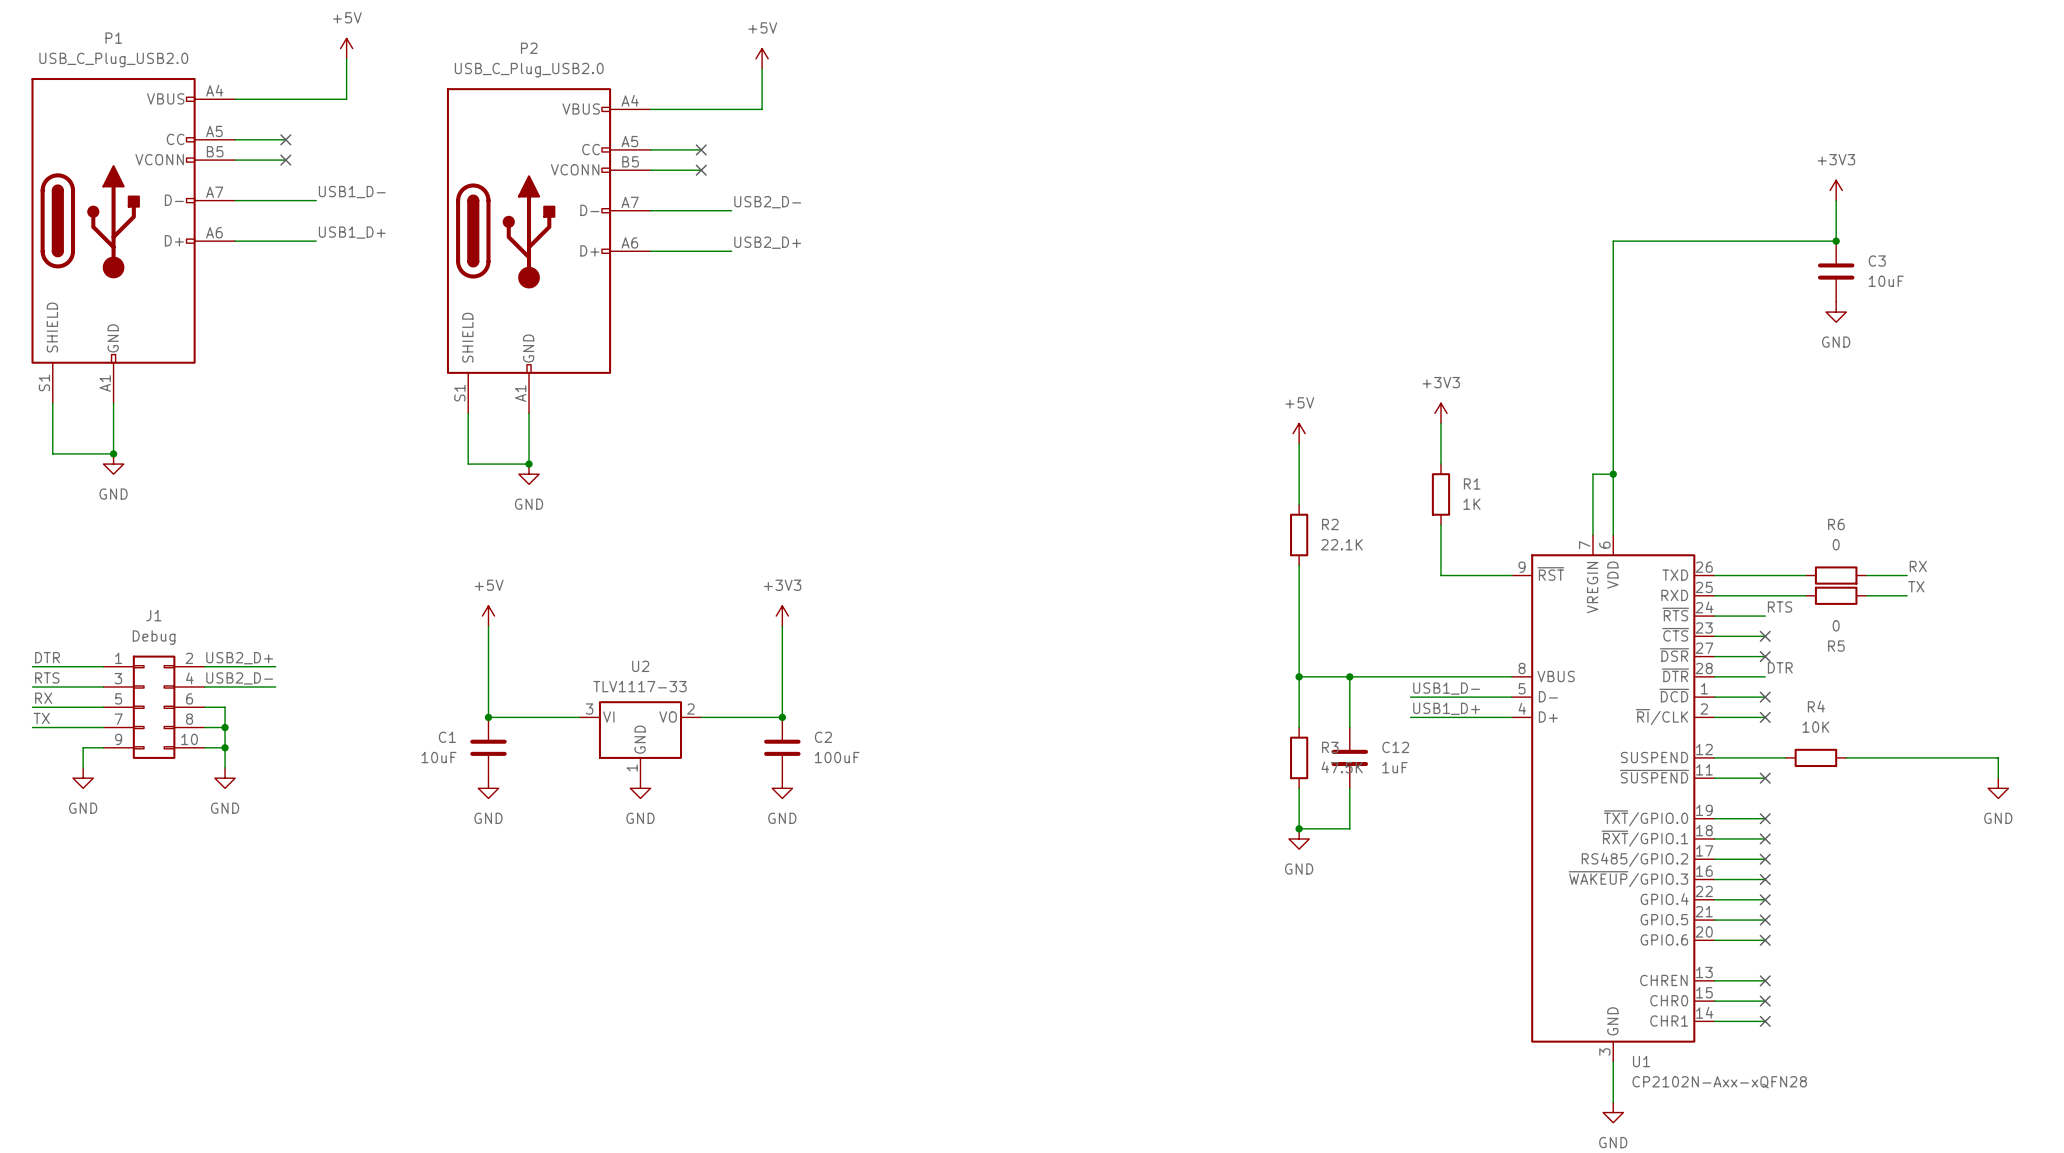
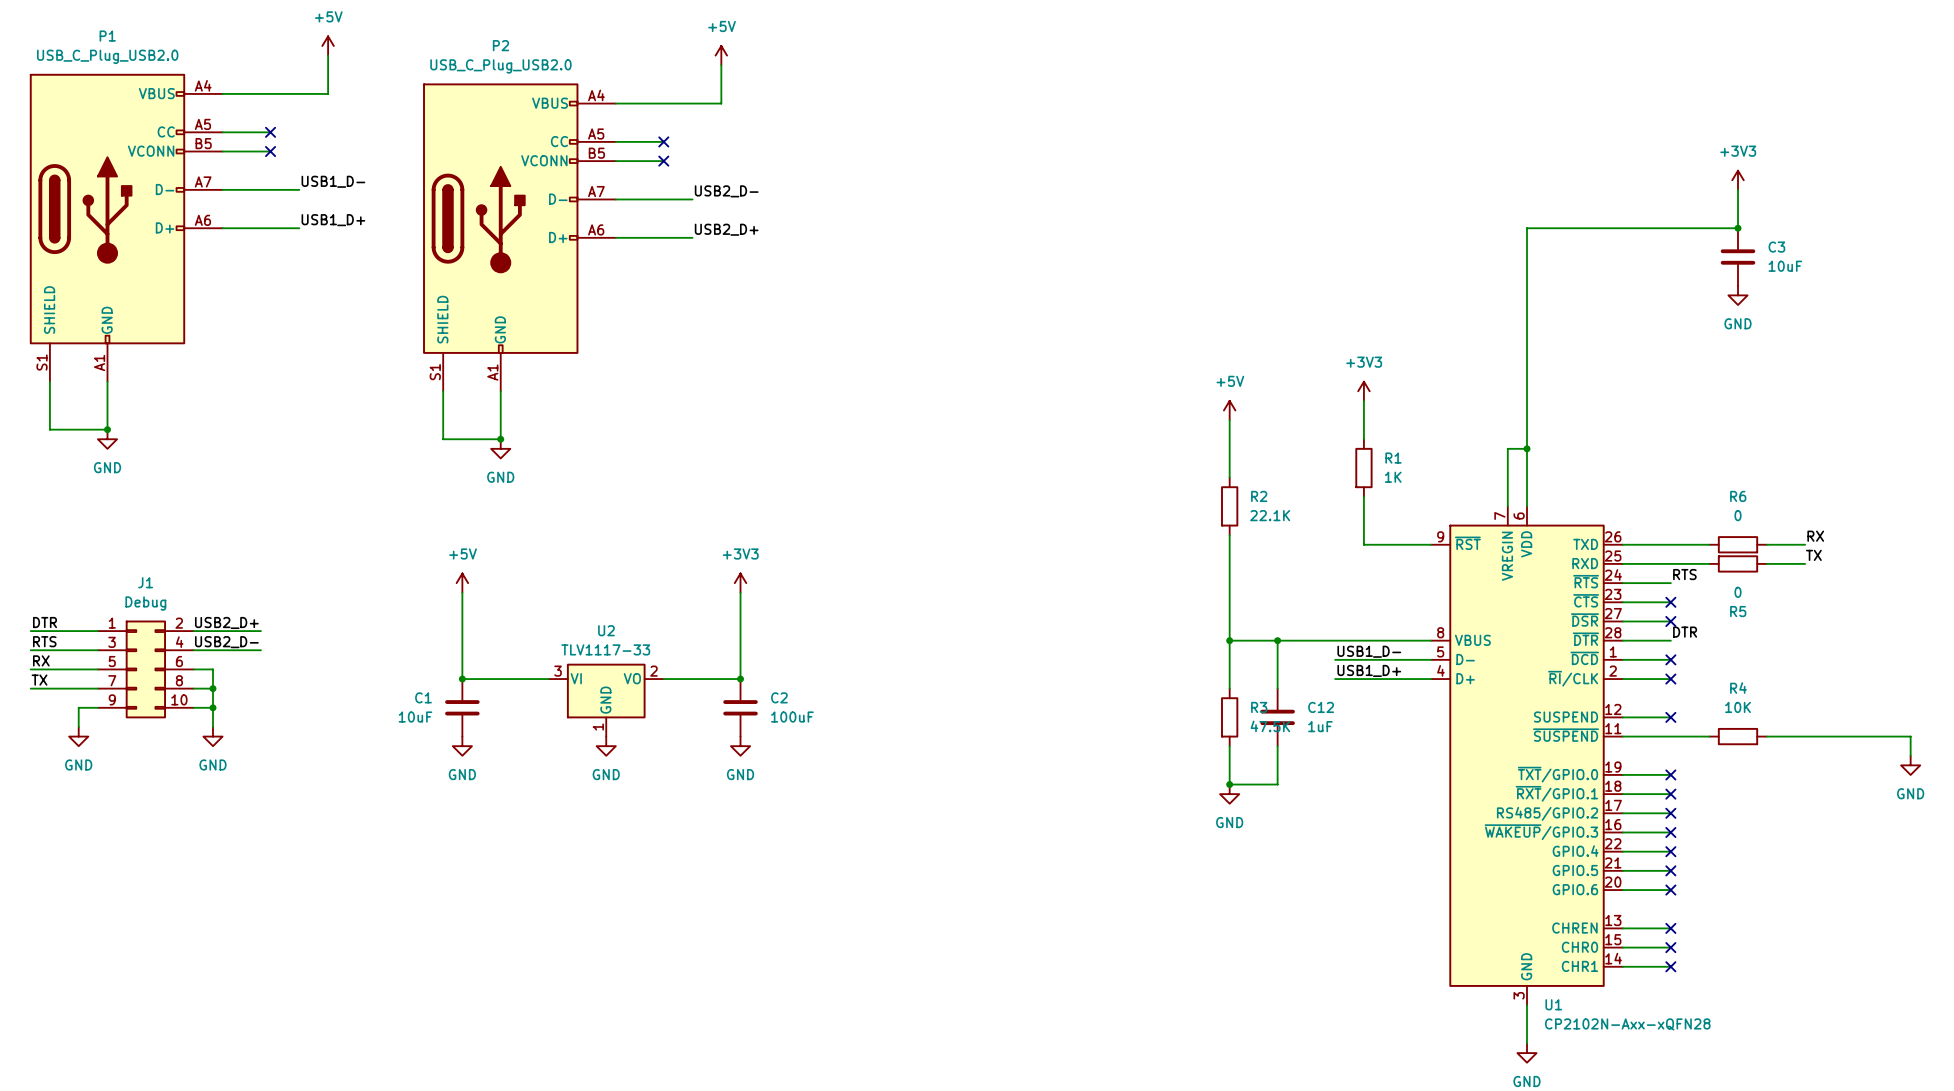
wire: (1765, 757) (1785, 757) -> none
R4 position: (1815, 757) -> (1738, 736)
wire: (1846, 757) (1998, 757) (1998, 778) -> (1766, 736) (1910, 736) (1910, 755)
wire: none -> (1670, 736) (1709, 736)
no-connect mark position: (1765, 778) -> (1670, 717)
power symbol position: GND (1998, 788) -> GND (1910, 765)

